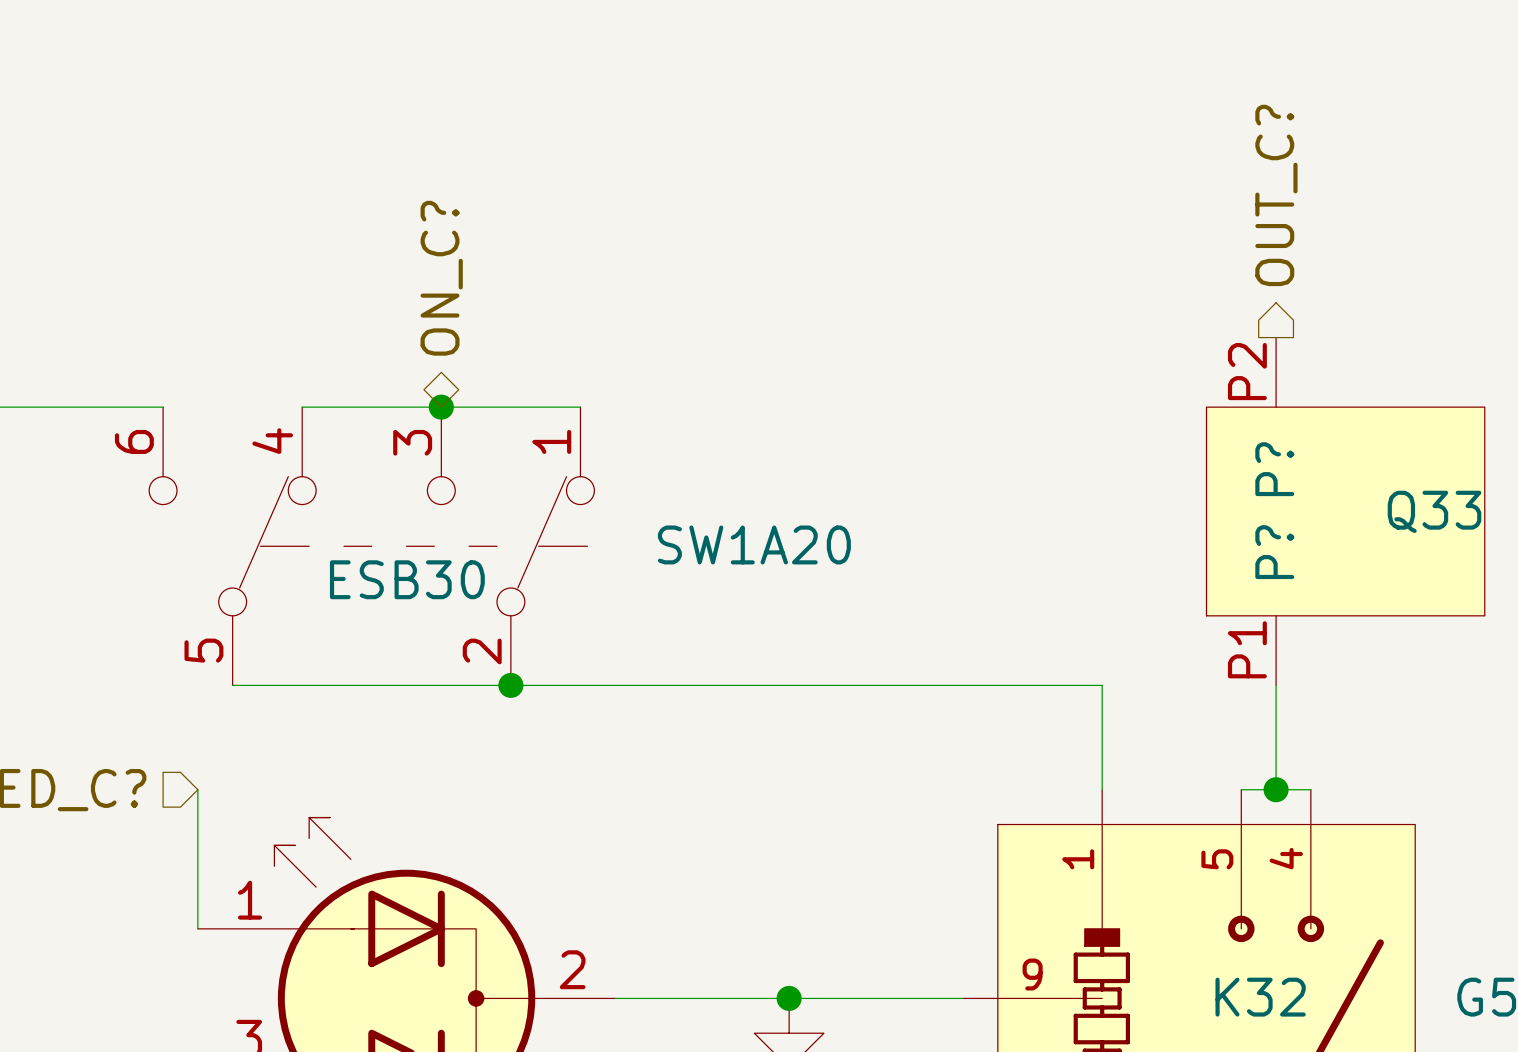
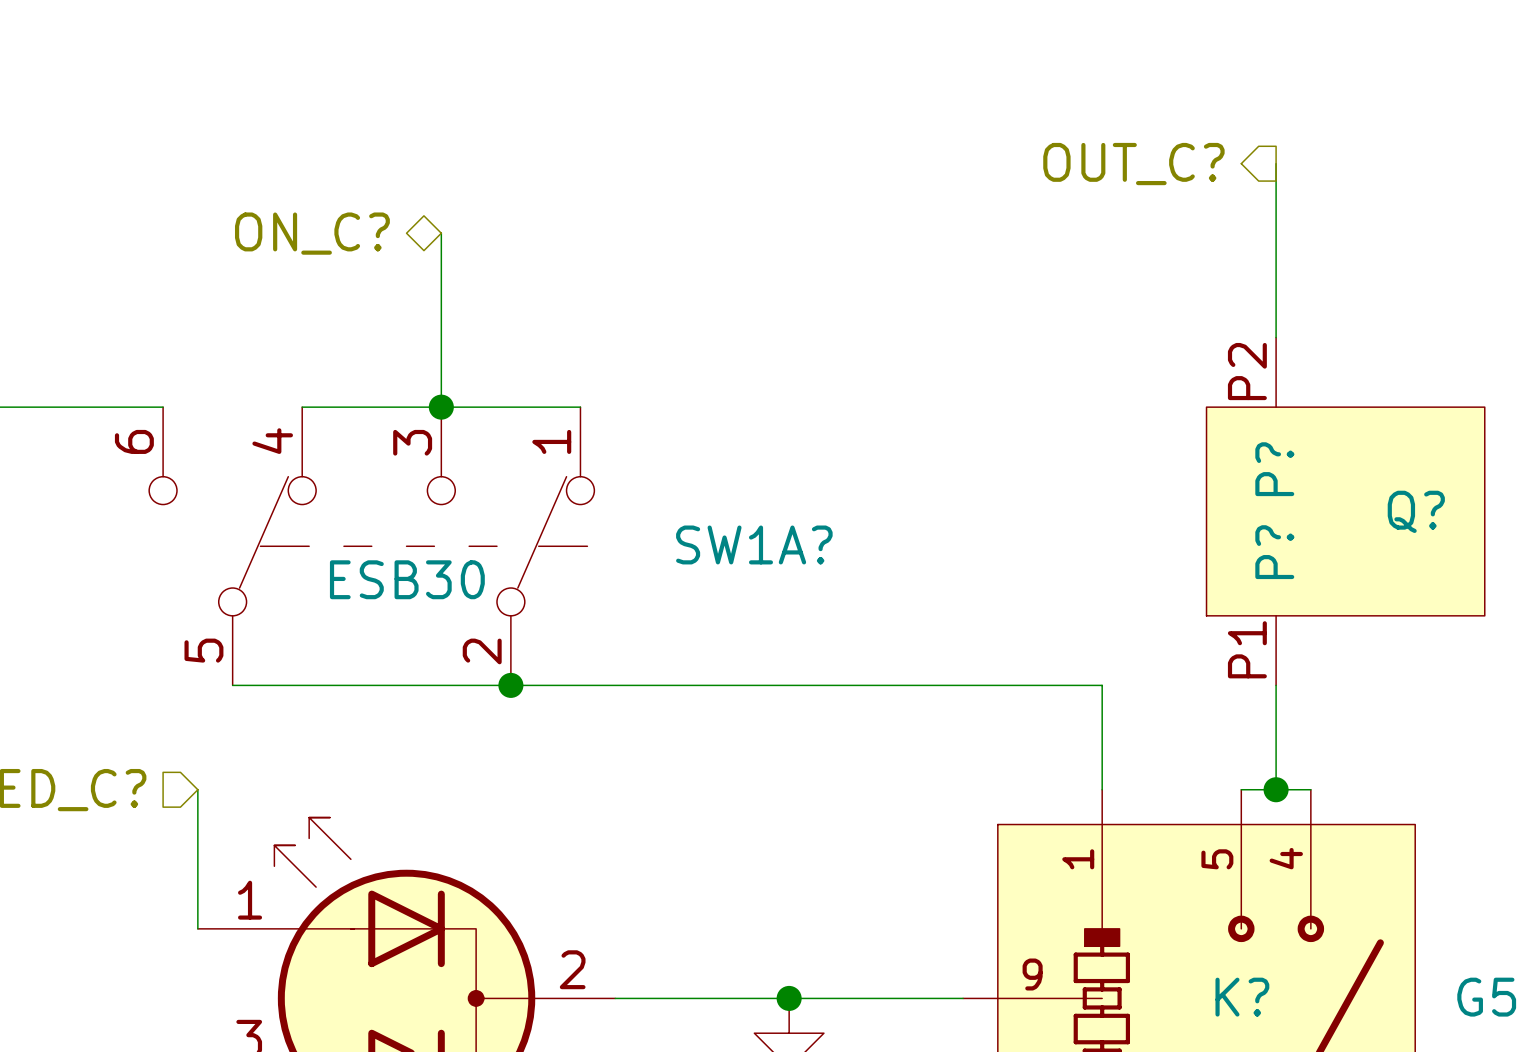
wire: none -> (1276, 163) (1276, 337)
hierarchical label rotation: 0° (1276, 195) -> 90° counterclockwise (1133, 164)
wire: none -> (441, 233) (441, 407)
hierarchical label rotation: 0° (441, 278) -> 90° counterclockwise (312, 233)
Q33 name: Q33 (1434, 511) -> Q? (1416, 511)
SW1A20 name: SW1A20 (754, 544) -> SW1A? (754, 544)
K32 name: K32 (1260, 997) -> K? (1242, 997)

